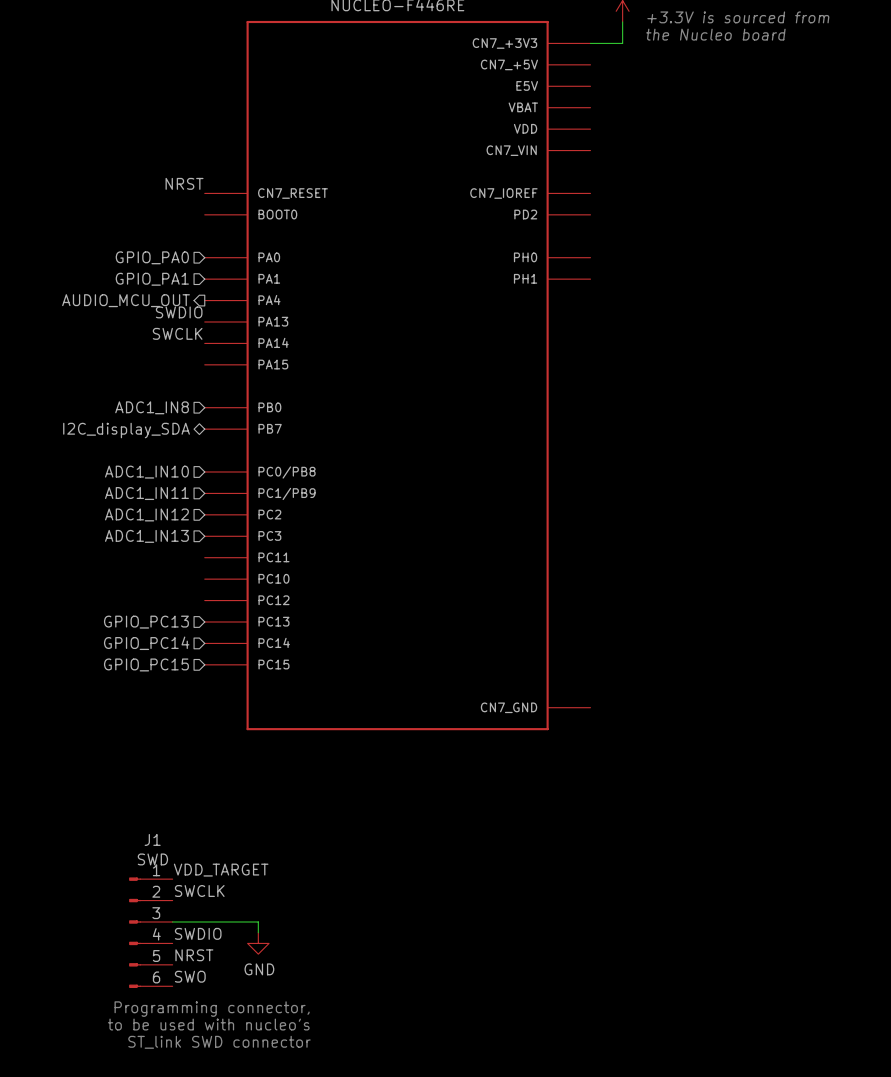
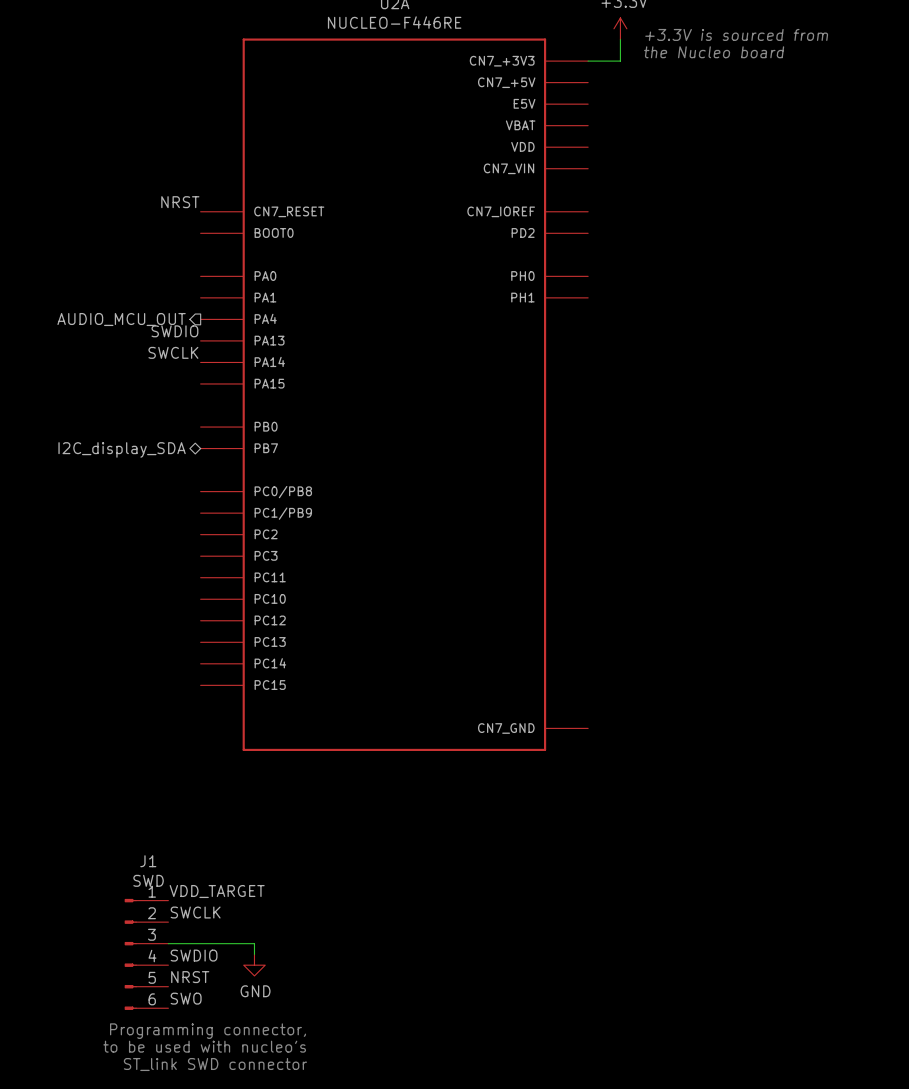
hierarchical label: GPIO_PA0 (152, 257) -> none
hierarchical label: GPIO_PA1 (152, 279) -> none
hierarchical label: ADC1_IN8 (152, 407) -> none
hierarchical label: ADC1_IN10 (146, 472) -> none
hierarchical label: ADC1_IN11 (146, 493) -> none
hierarchical label: ADC1_IN12 (146, 514) -> none
hierarchical label: ADC1_IN13 (146, 536) -> none
hierarchical label: GPIO_PC13 (146, 622) -> none
hierarchical label: GPIO_PC14 (146, 643) -> none
hierarchical label: GPIO_PC15 (146, 664) -> none

